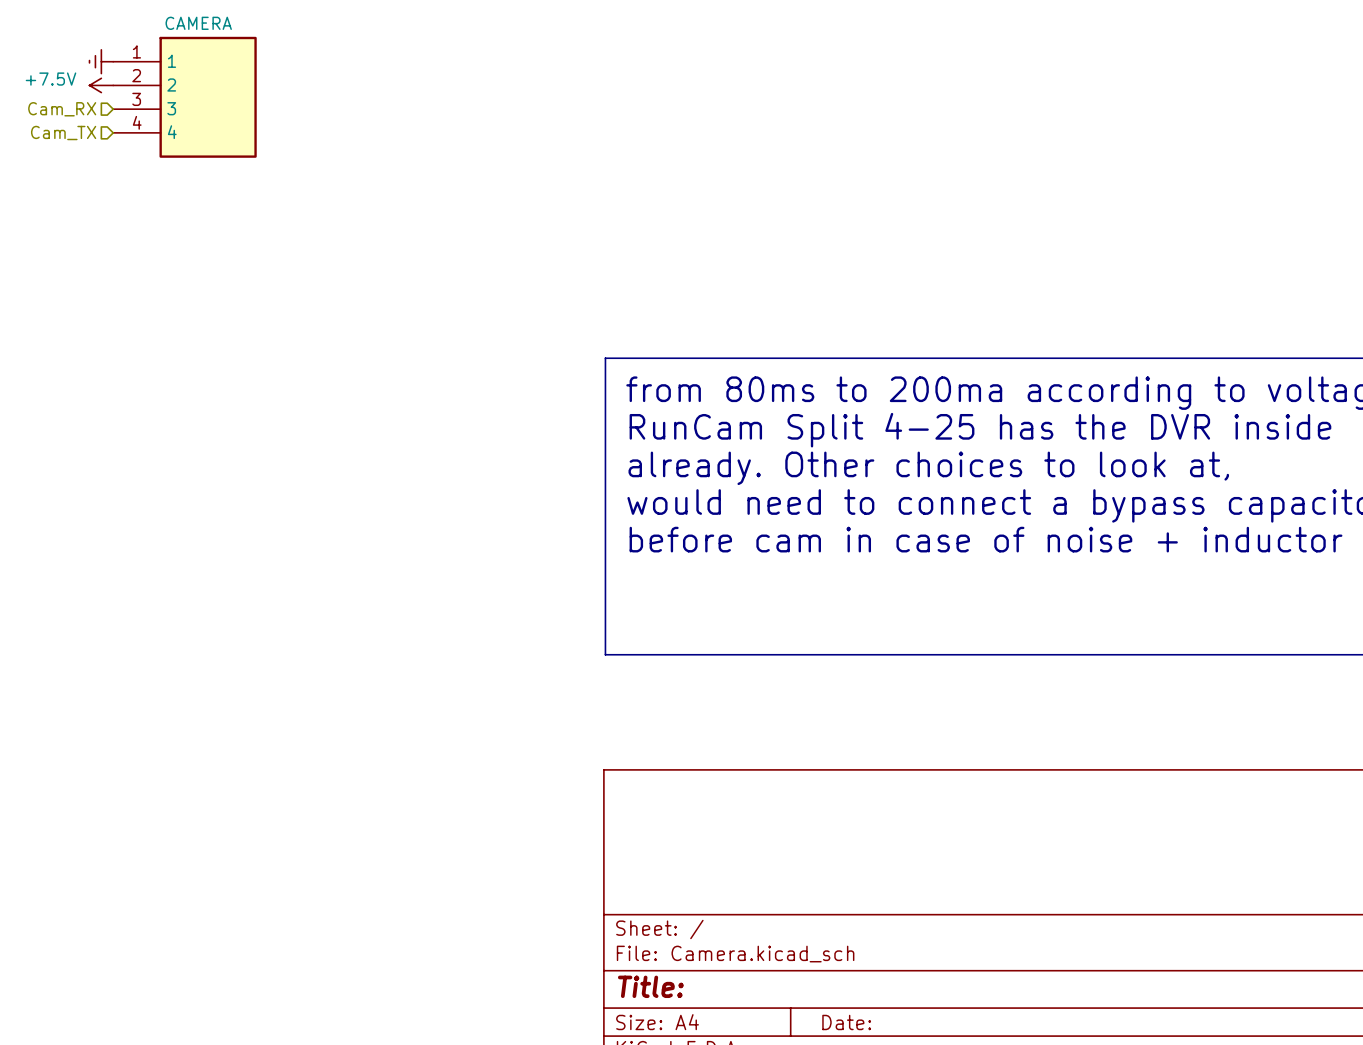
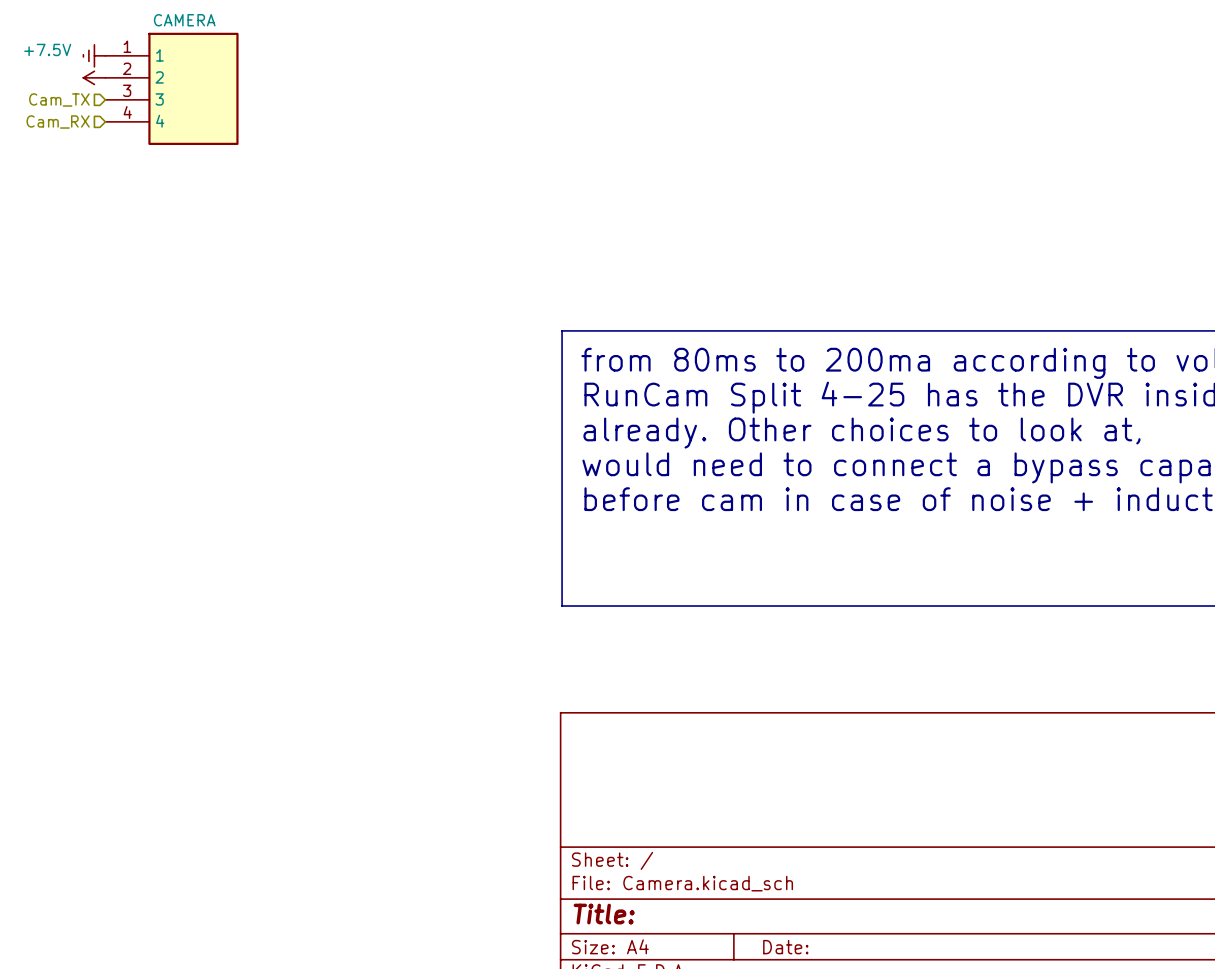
power symbol text: none -> +7.5V (47, 49)
power symbol text: +7.5V (51, 79) -> none
hierarchical label: Cam_RX (62, 109) -> Cam_TX (59, 99)
hierarchical label: Cam_TX (63, 133) -> Cam_RX (58, 121)

